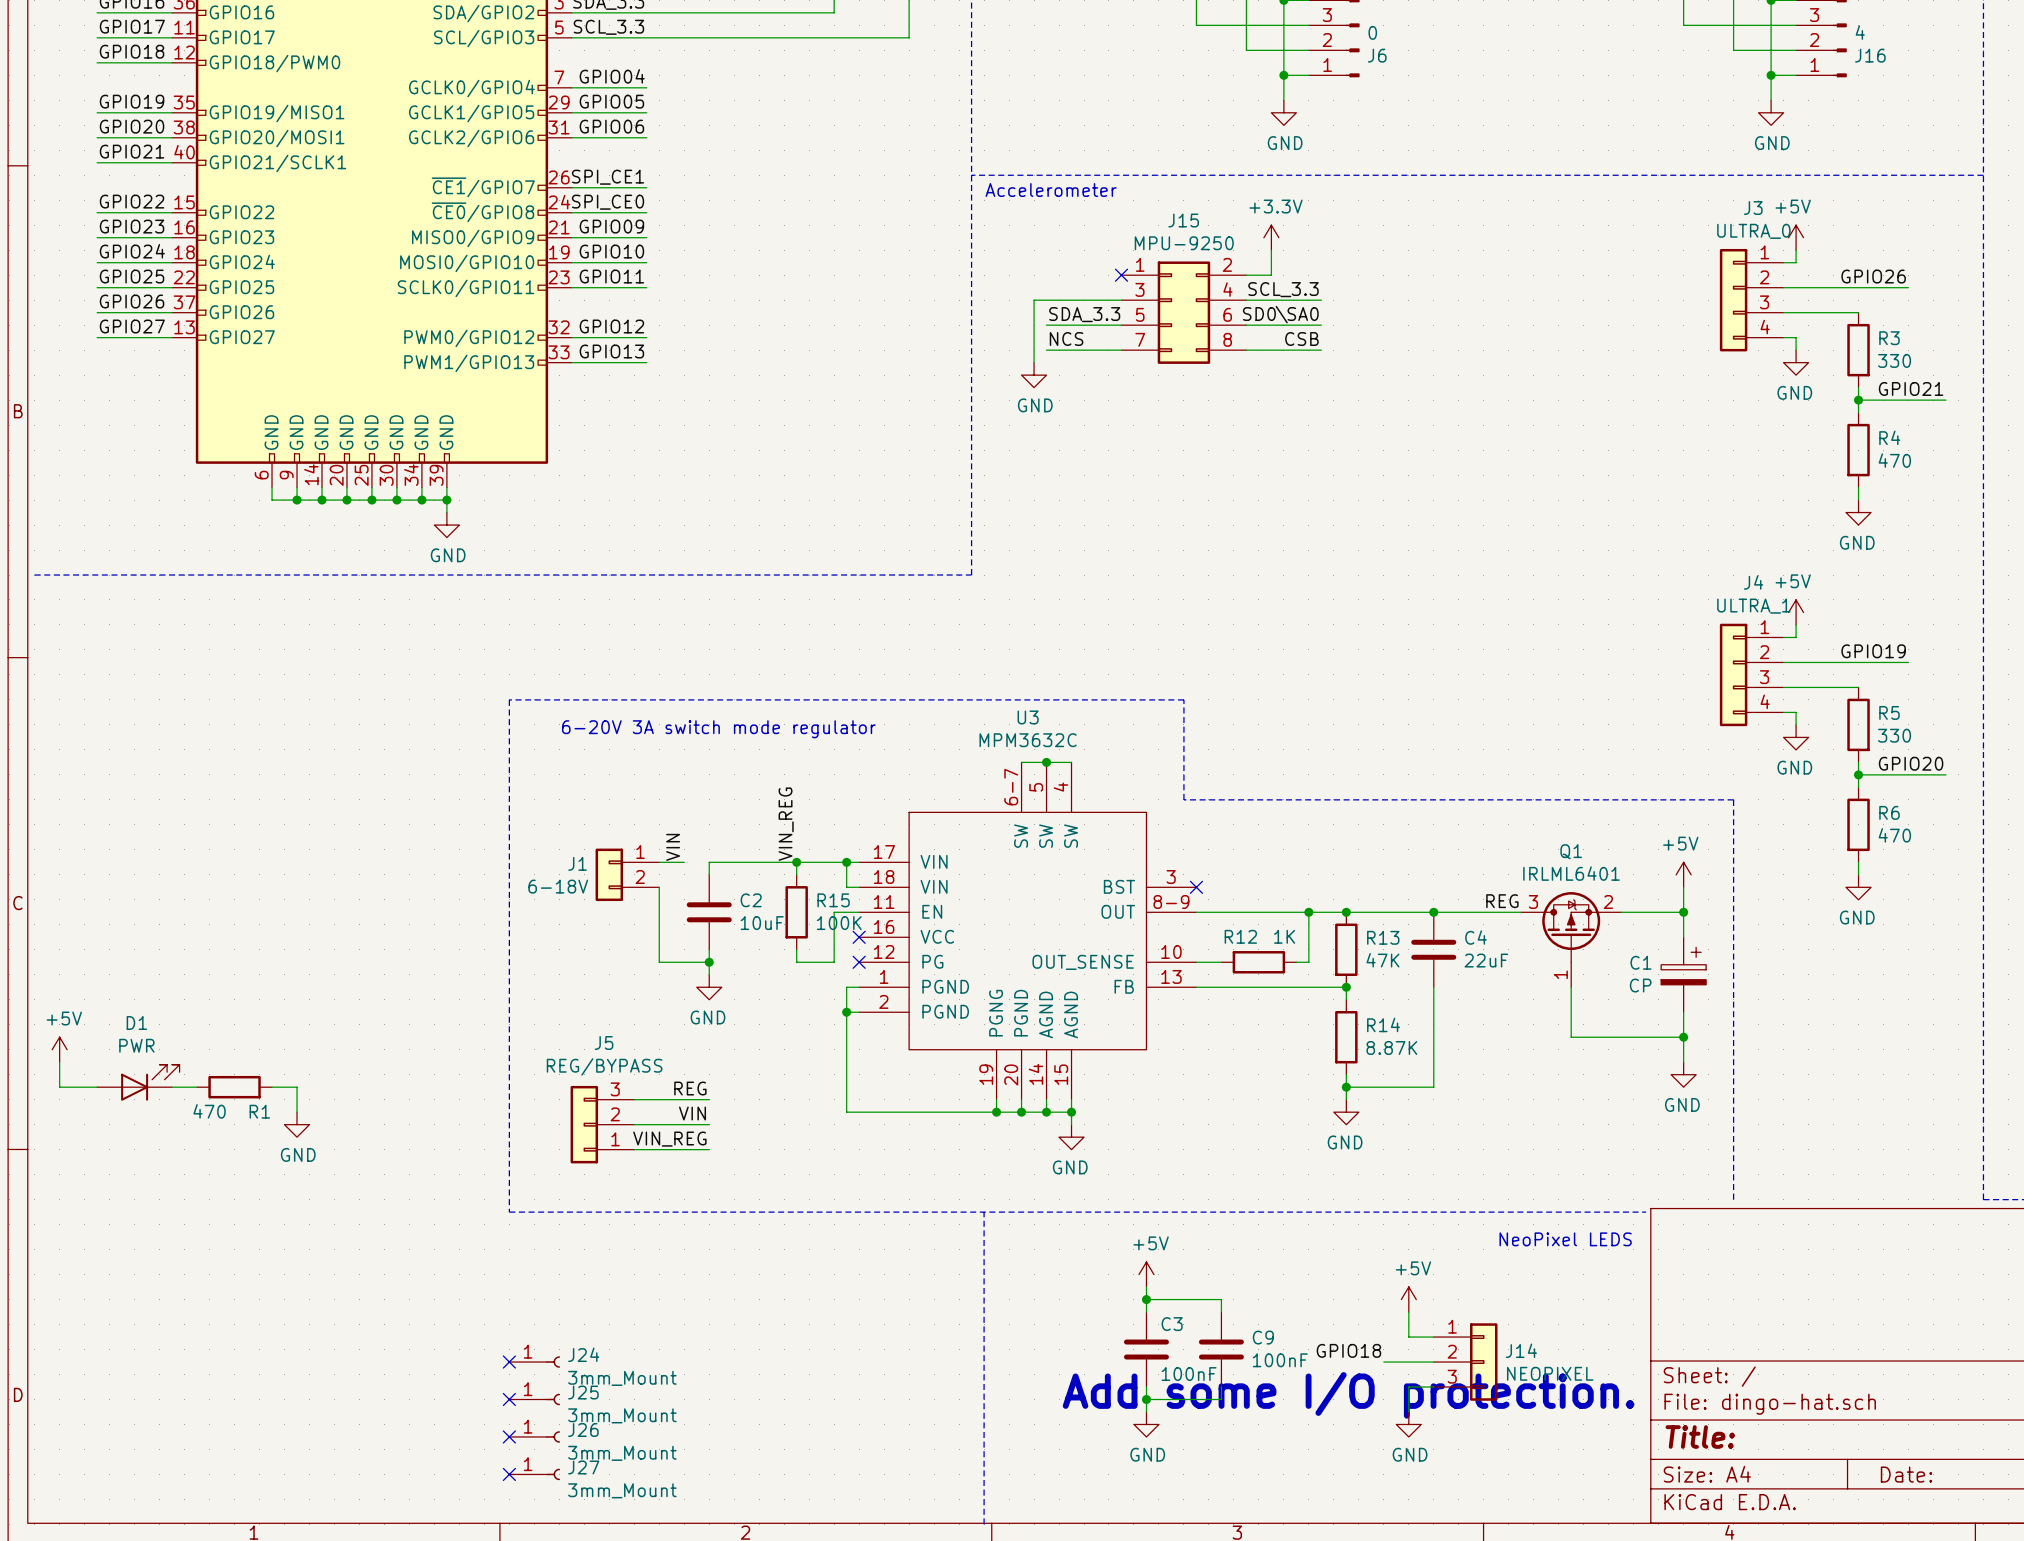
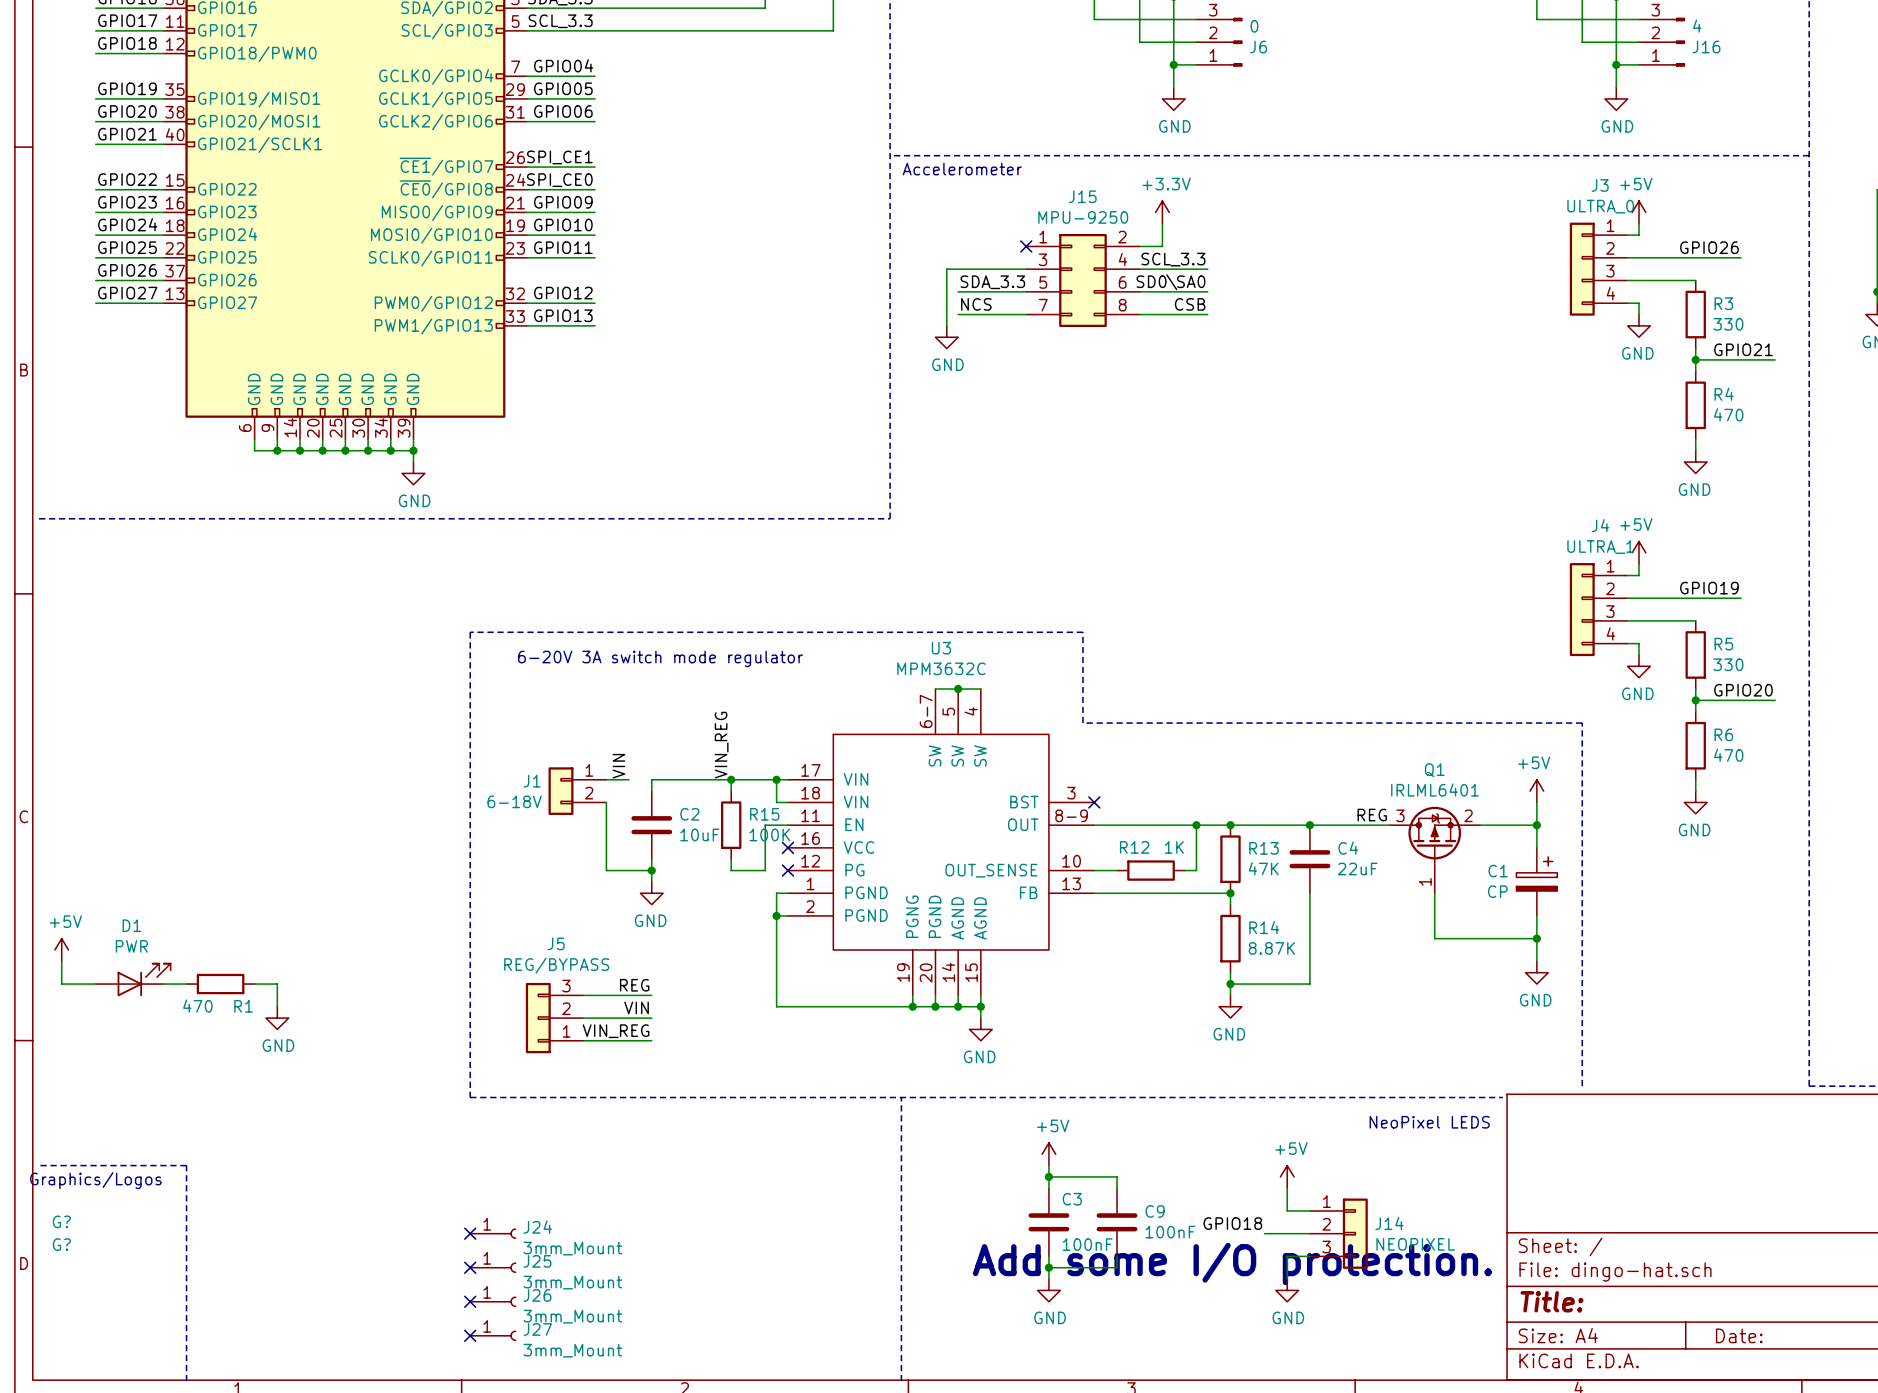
line: none -> (39, 1165) (186, 1165) (186, 1381)
text: none -> Graphics/Logos (95, 1180)
G?: none -> (61, 1221)
G?: none -> (61, 1244)

